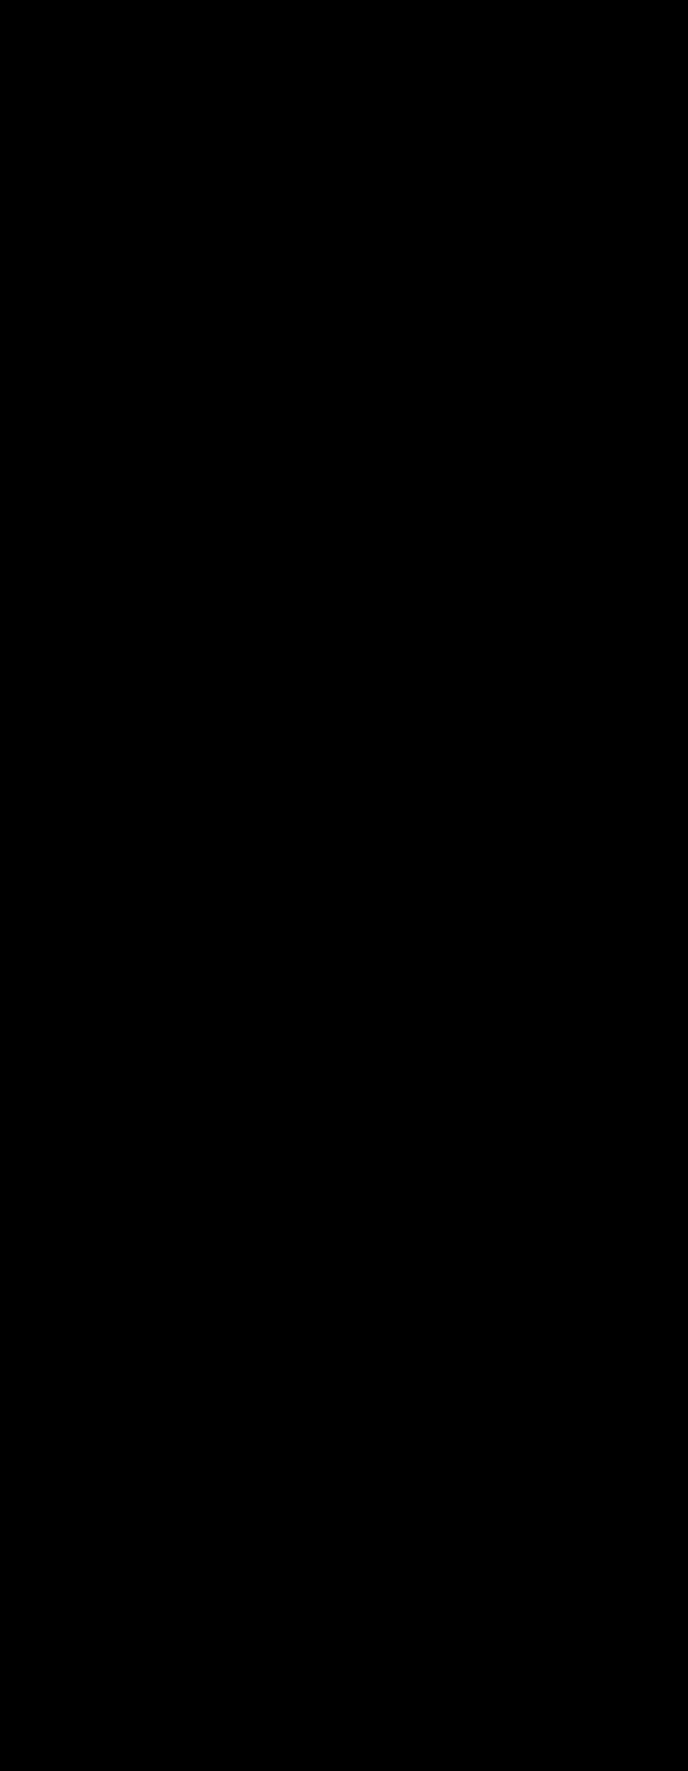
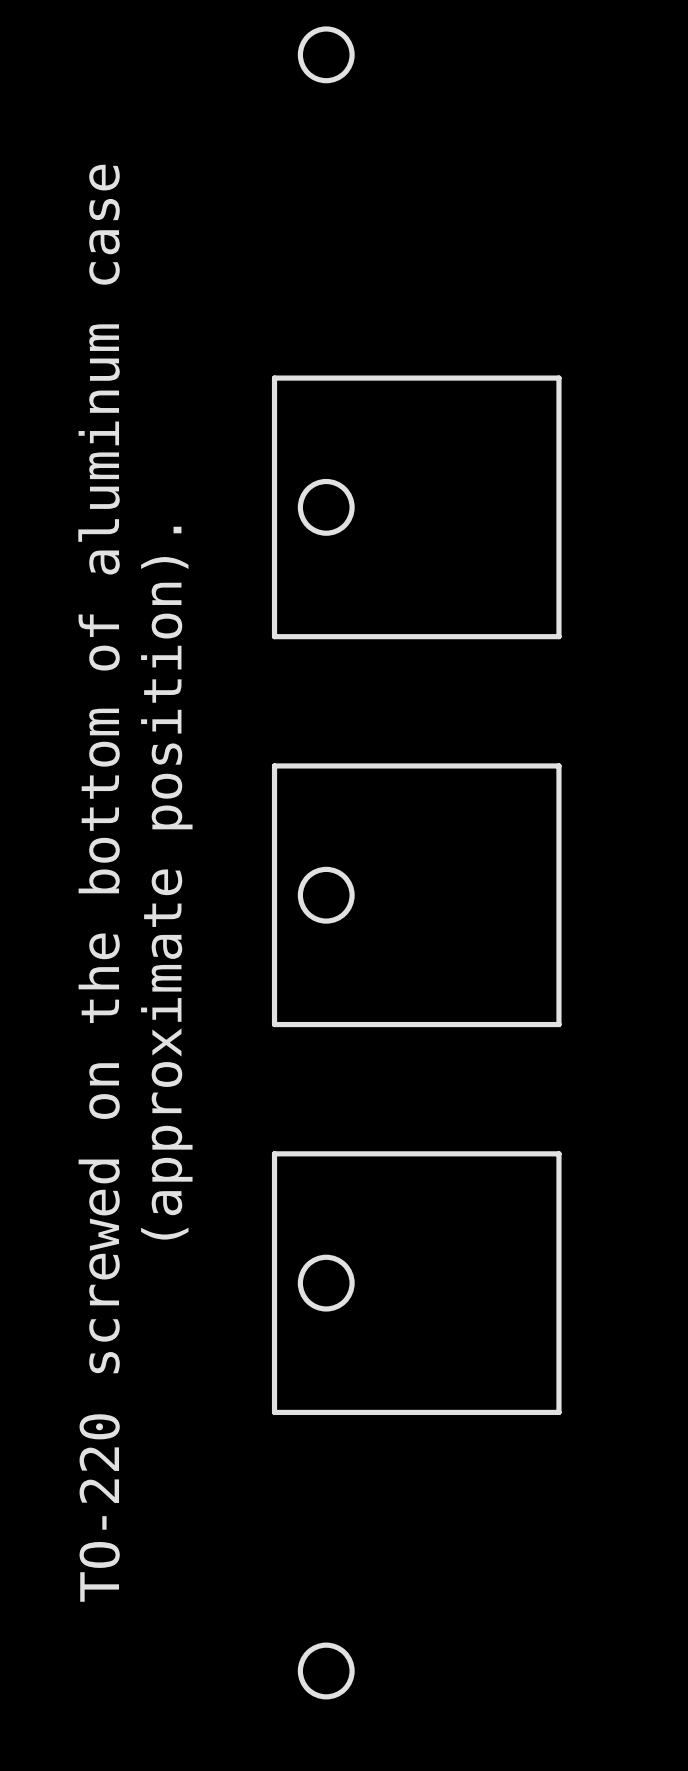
drawing: none -> [297, 26, 355, 84]
line: none -> (274, 378) (274, 636) (558, 636) (558, 378) (274, 378)
drawing: none -> [297, 478, 355, 536]
line: none -> (274, 765) (274, 1024) (558, 1024) (558, 765) (274, 765)
drawing: none -> [297, 866, 355, 924]
text: none -> TO-220 screwed on the bottom of aluminum case (99, 883)
text: none -> (approximate position). (166, 883)
line: none -> (274, 1153) (558, 1153) (558, 1412) (274, 1412) (274, 1153)
drawing: none -> [297, 1254, 355, 1312]
drawing: none -> [297, 1642, 355, 1700]

